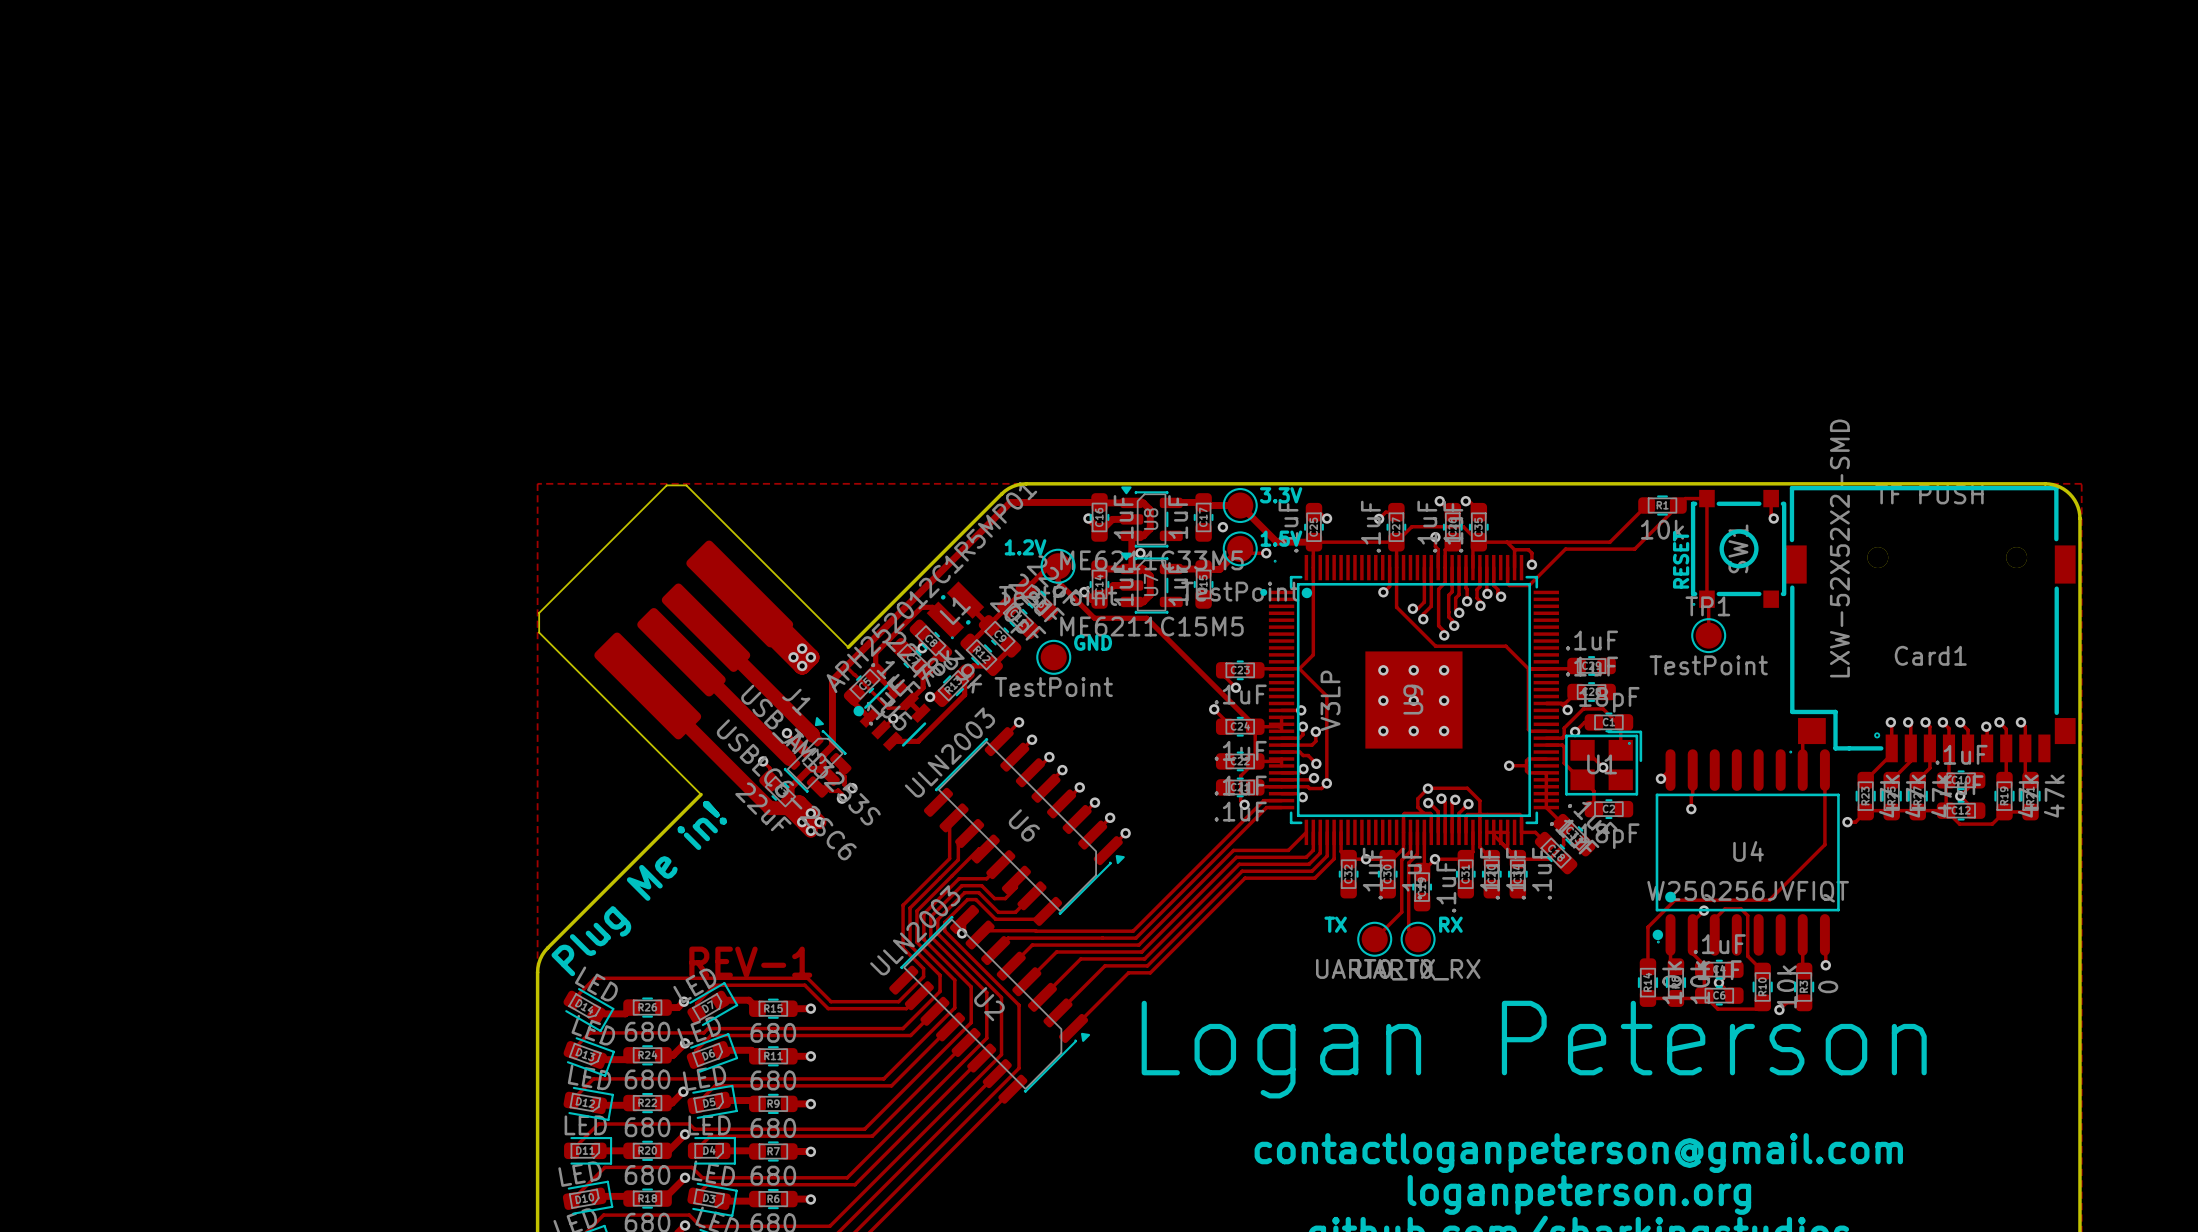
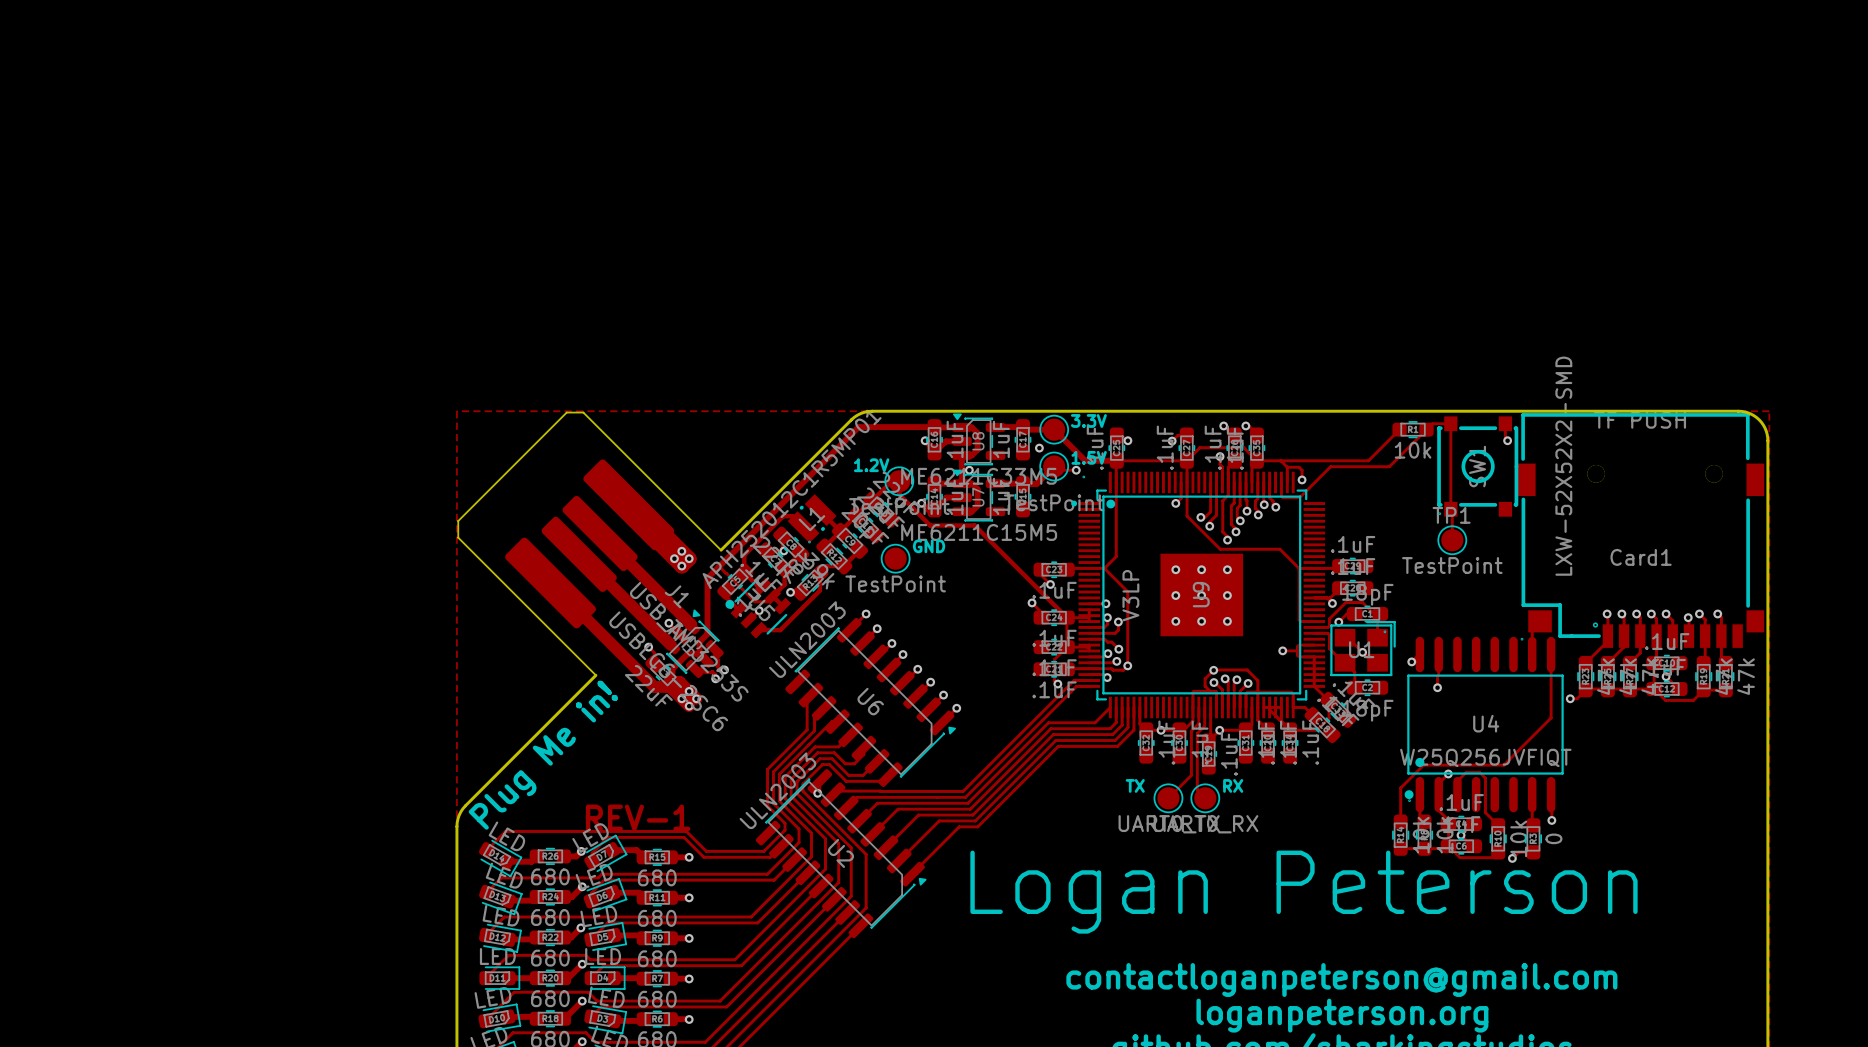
text: RESET (1681, 559) -> none

